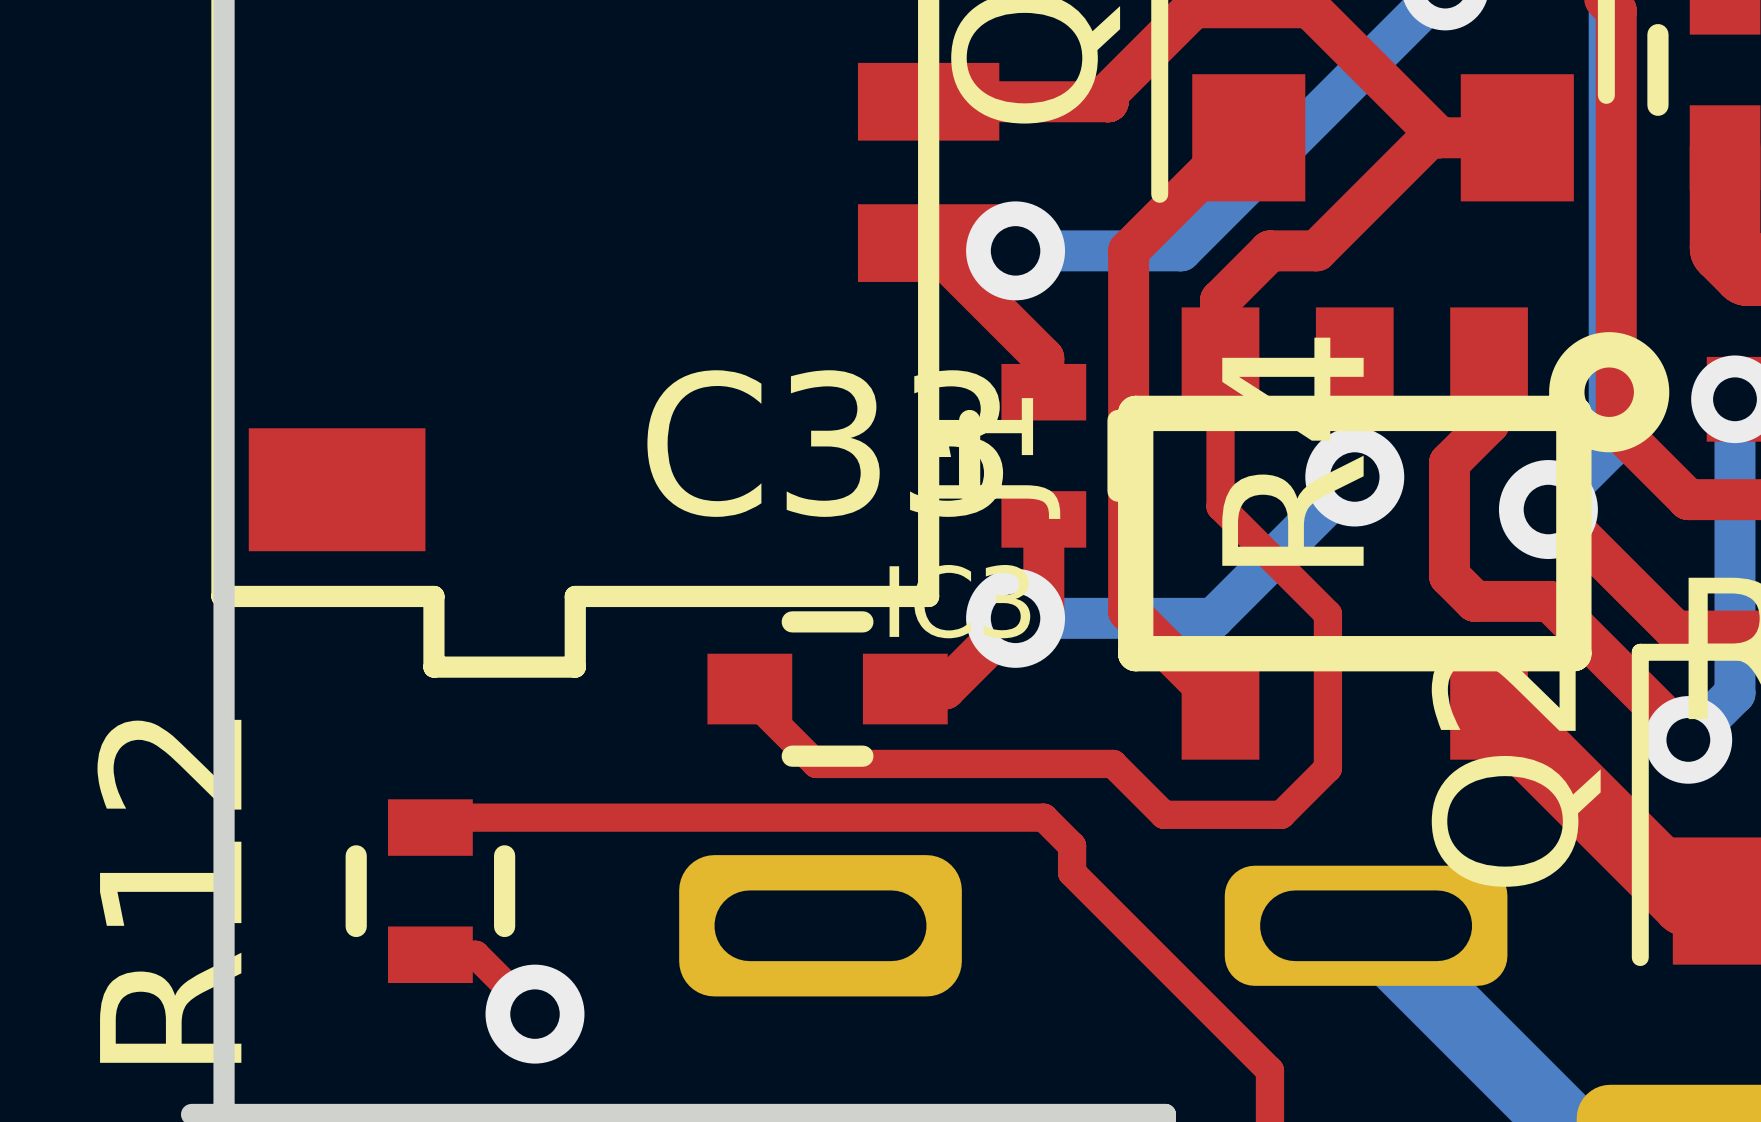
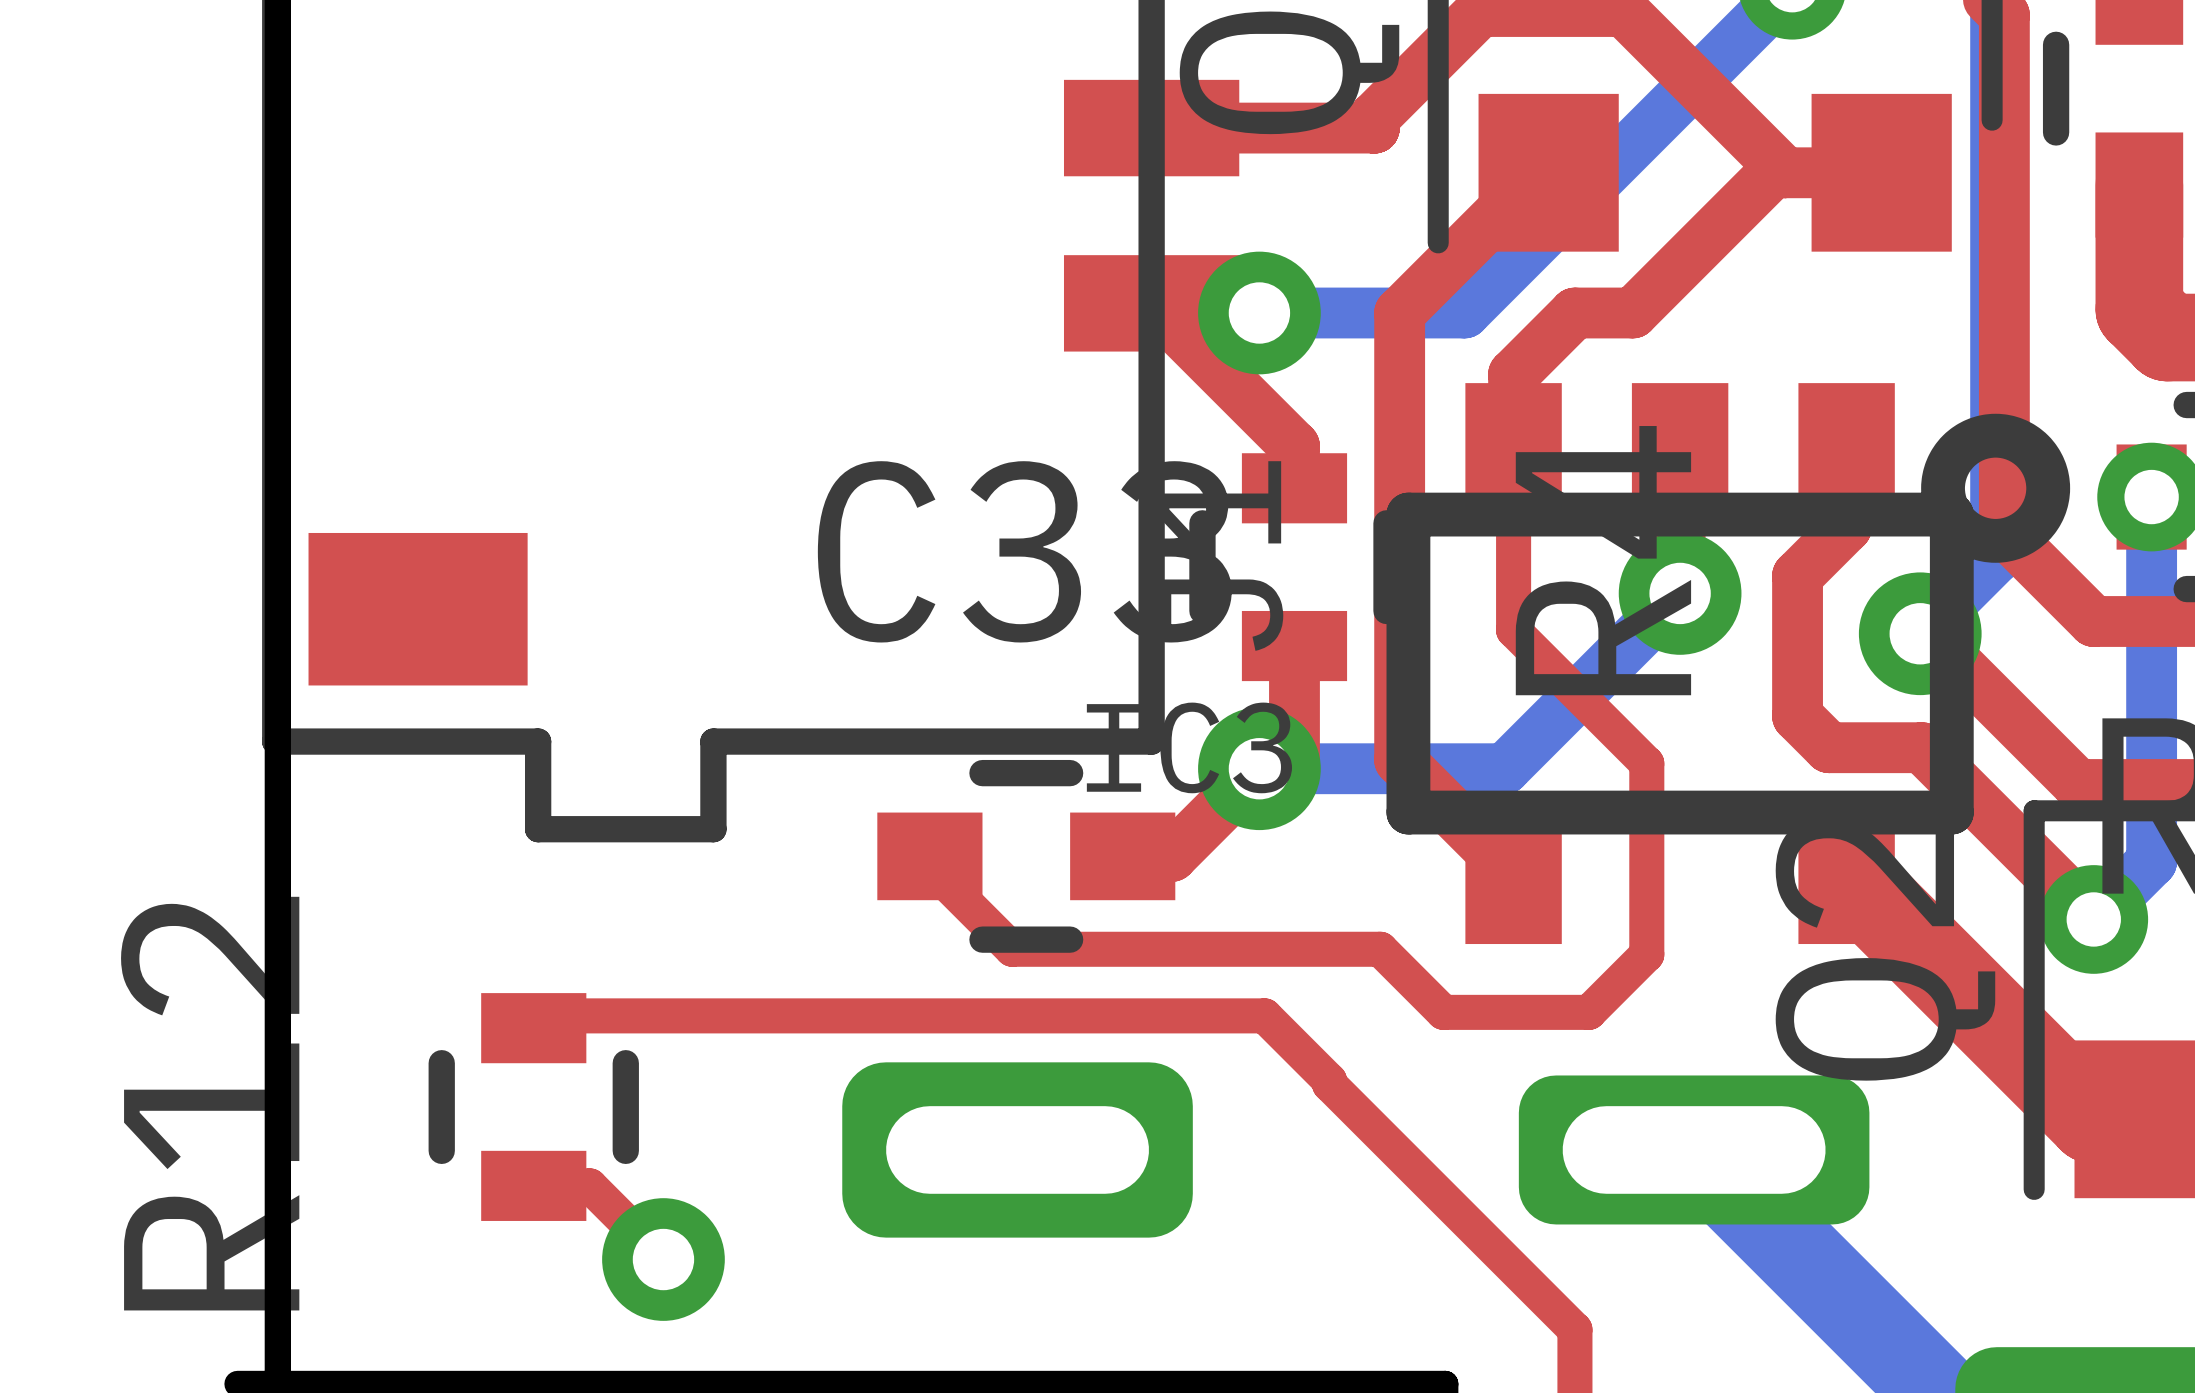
top track: (1019, 817) (1043, 817) (1072, 845) (1072, 869) -> (1264, 1015) (1329, 1080)

